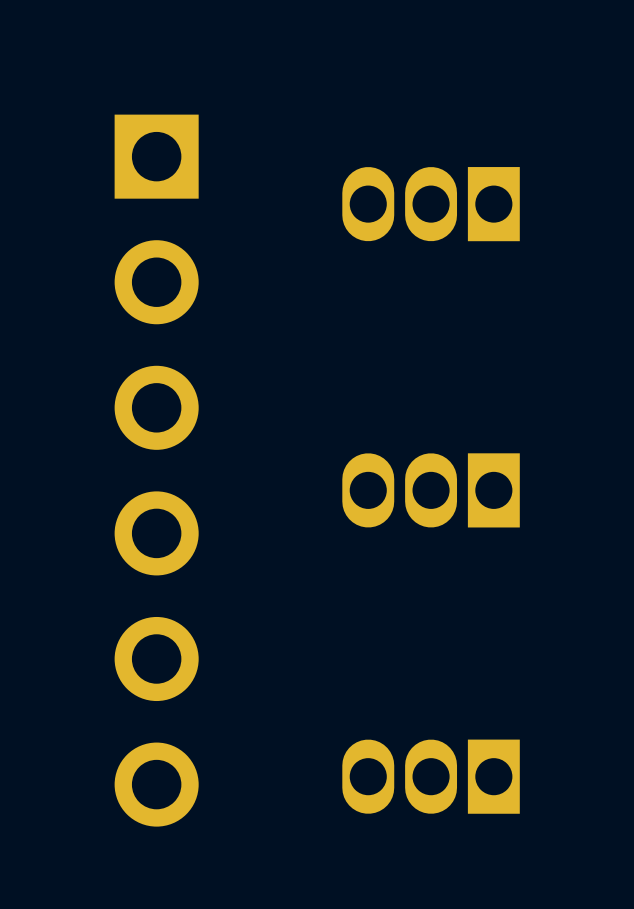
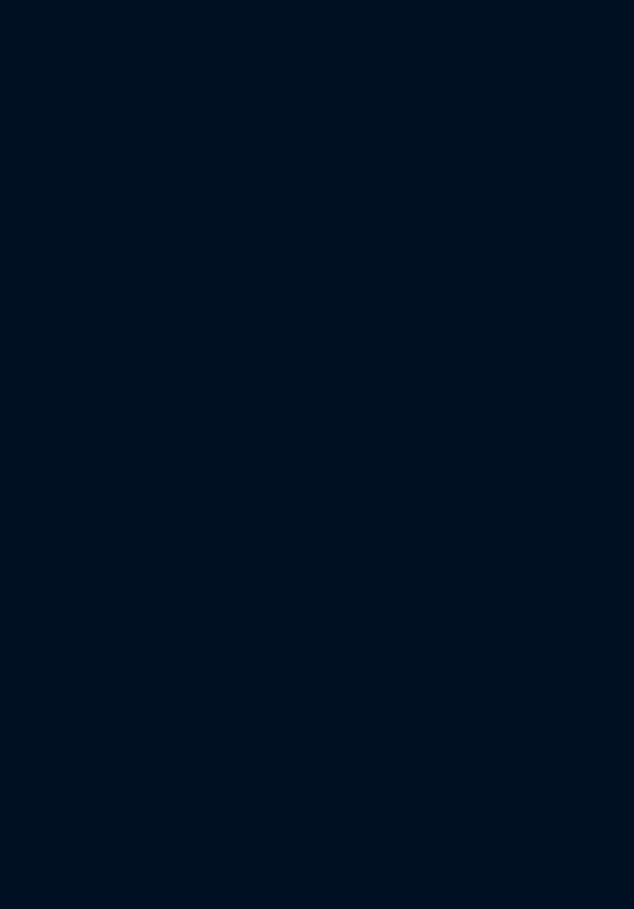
part: (431, 204) -> none
part: (156, 470) -> none
part: (431, 490) -> none
part: (431, 776) -> none

